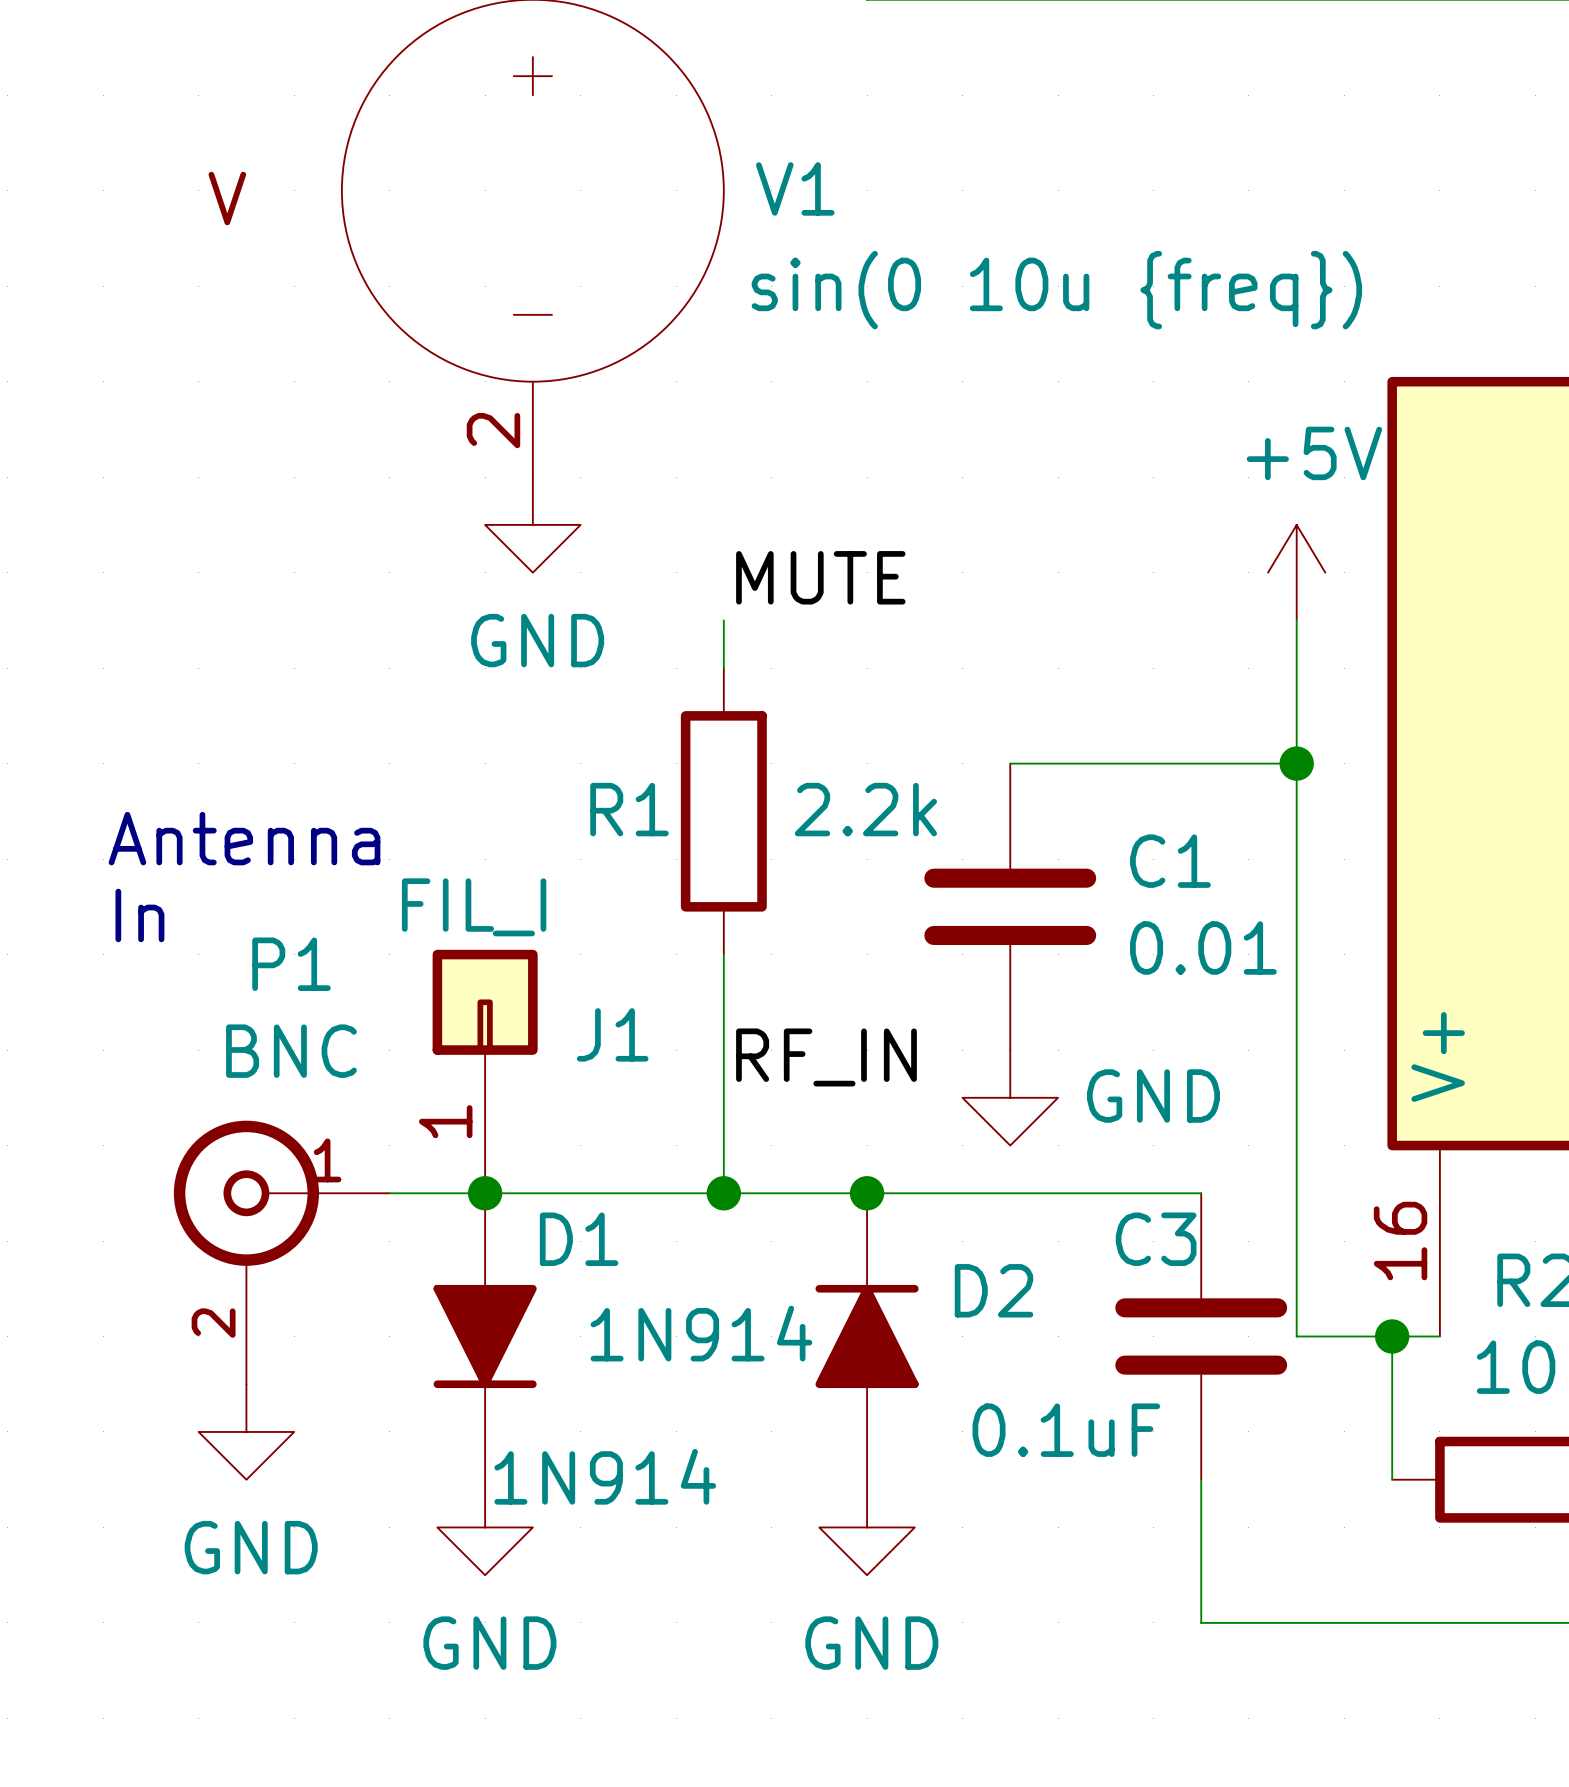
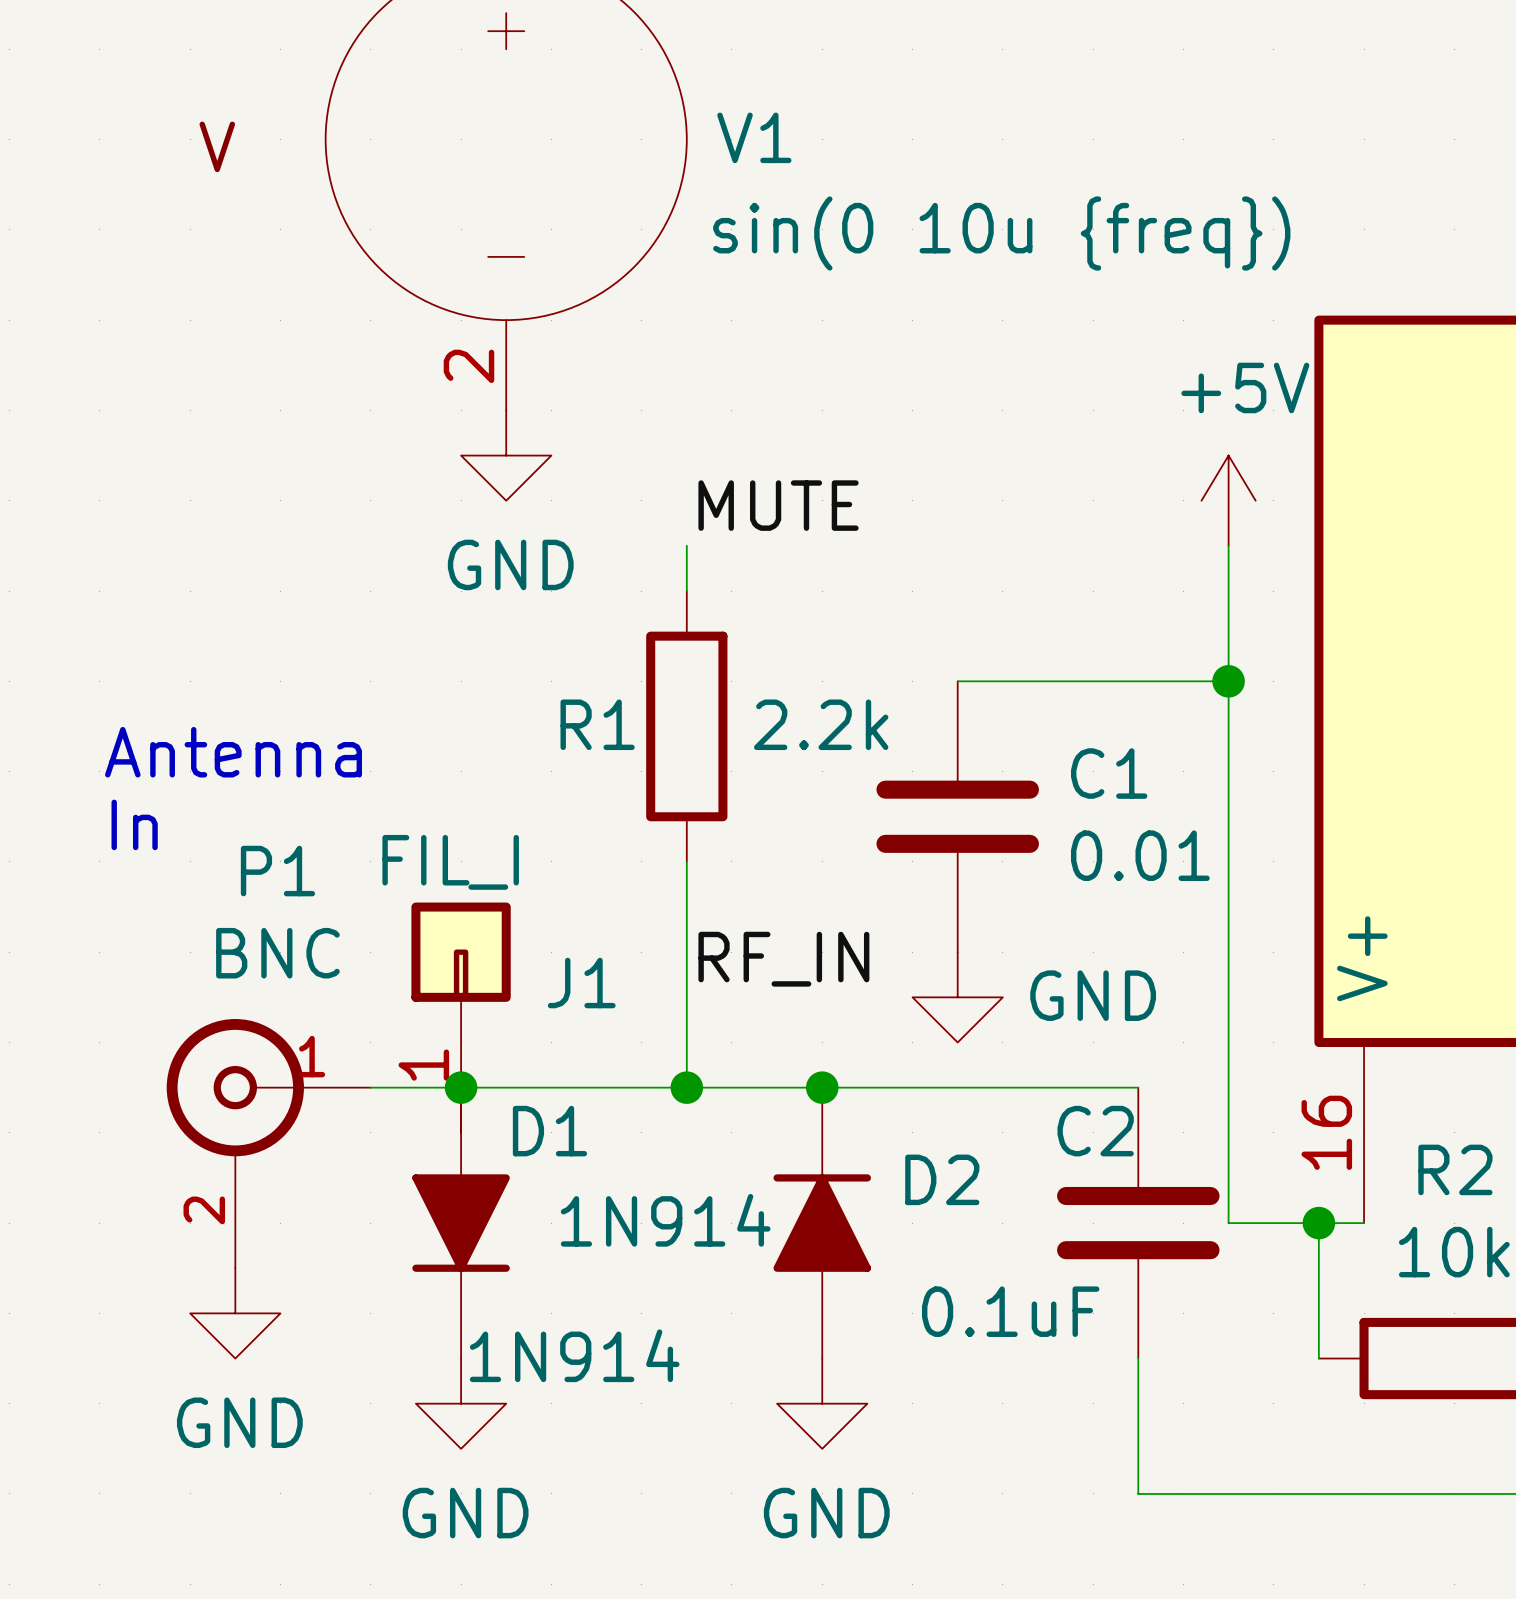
J1 position: (485, 1071) -> (461, 1017)
C3 name: C3 (1156, 1239) -> C2 (1095, 1131)

